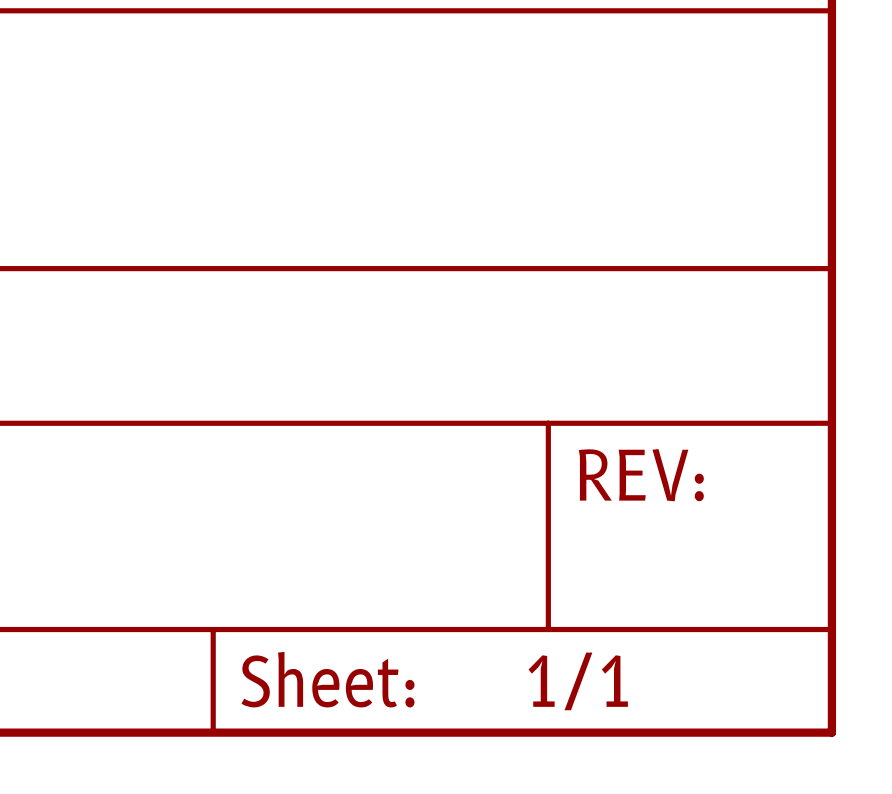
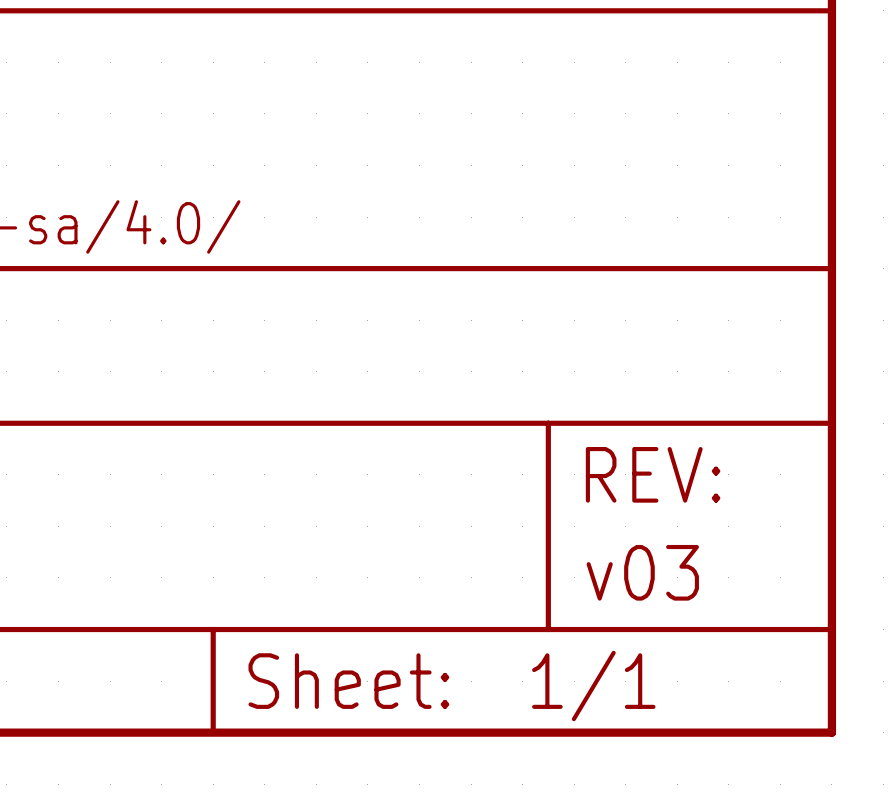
text: none -> v03 (642, 572)

